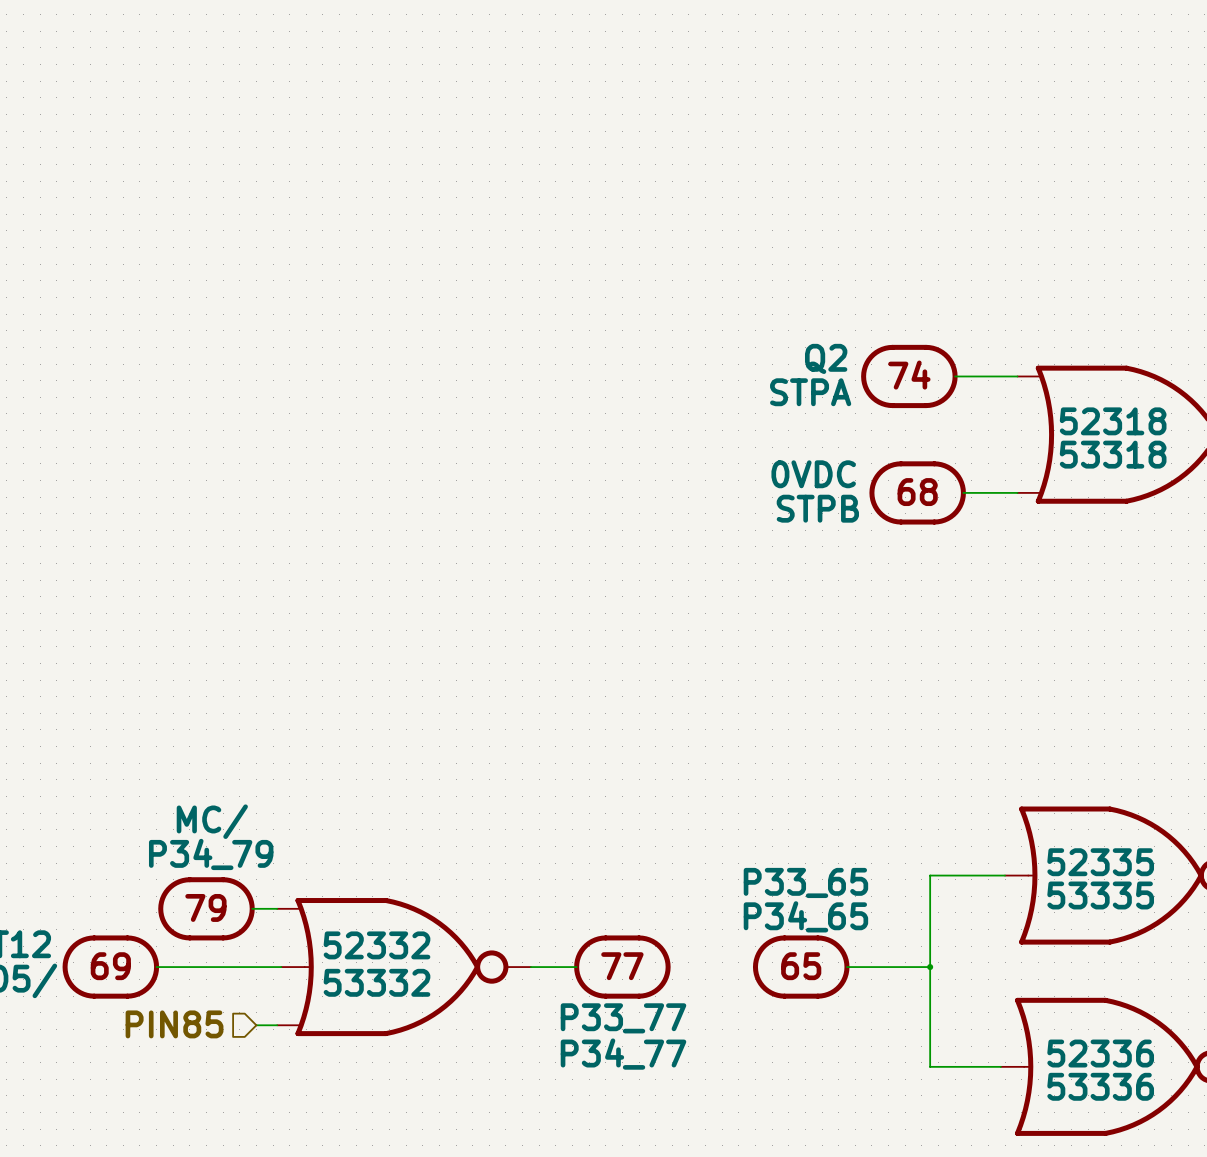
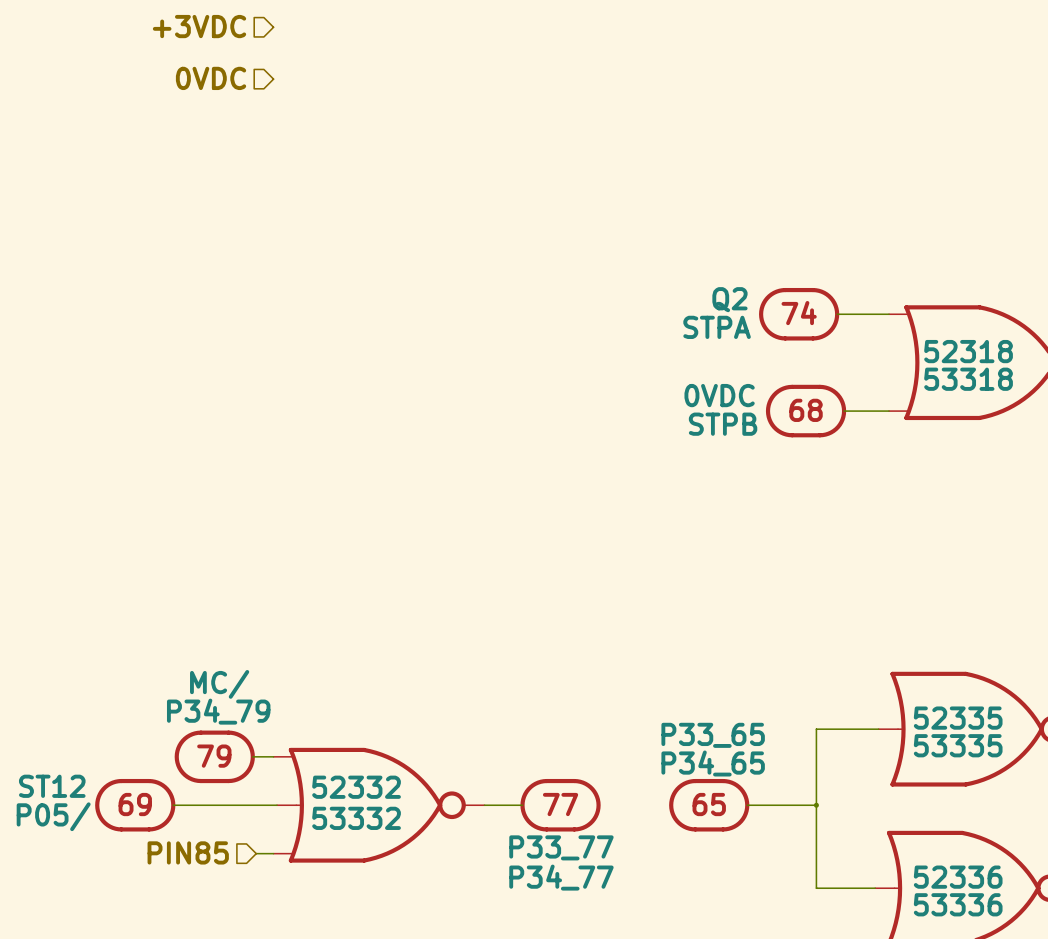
hierarchical label: none -> +3VDC (199, 26)
hierarchical label: none -> 0VDC (211, 78)

